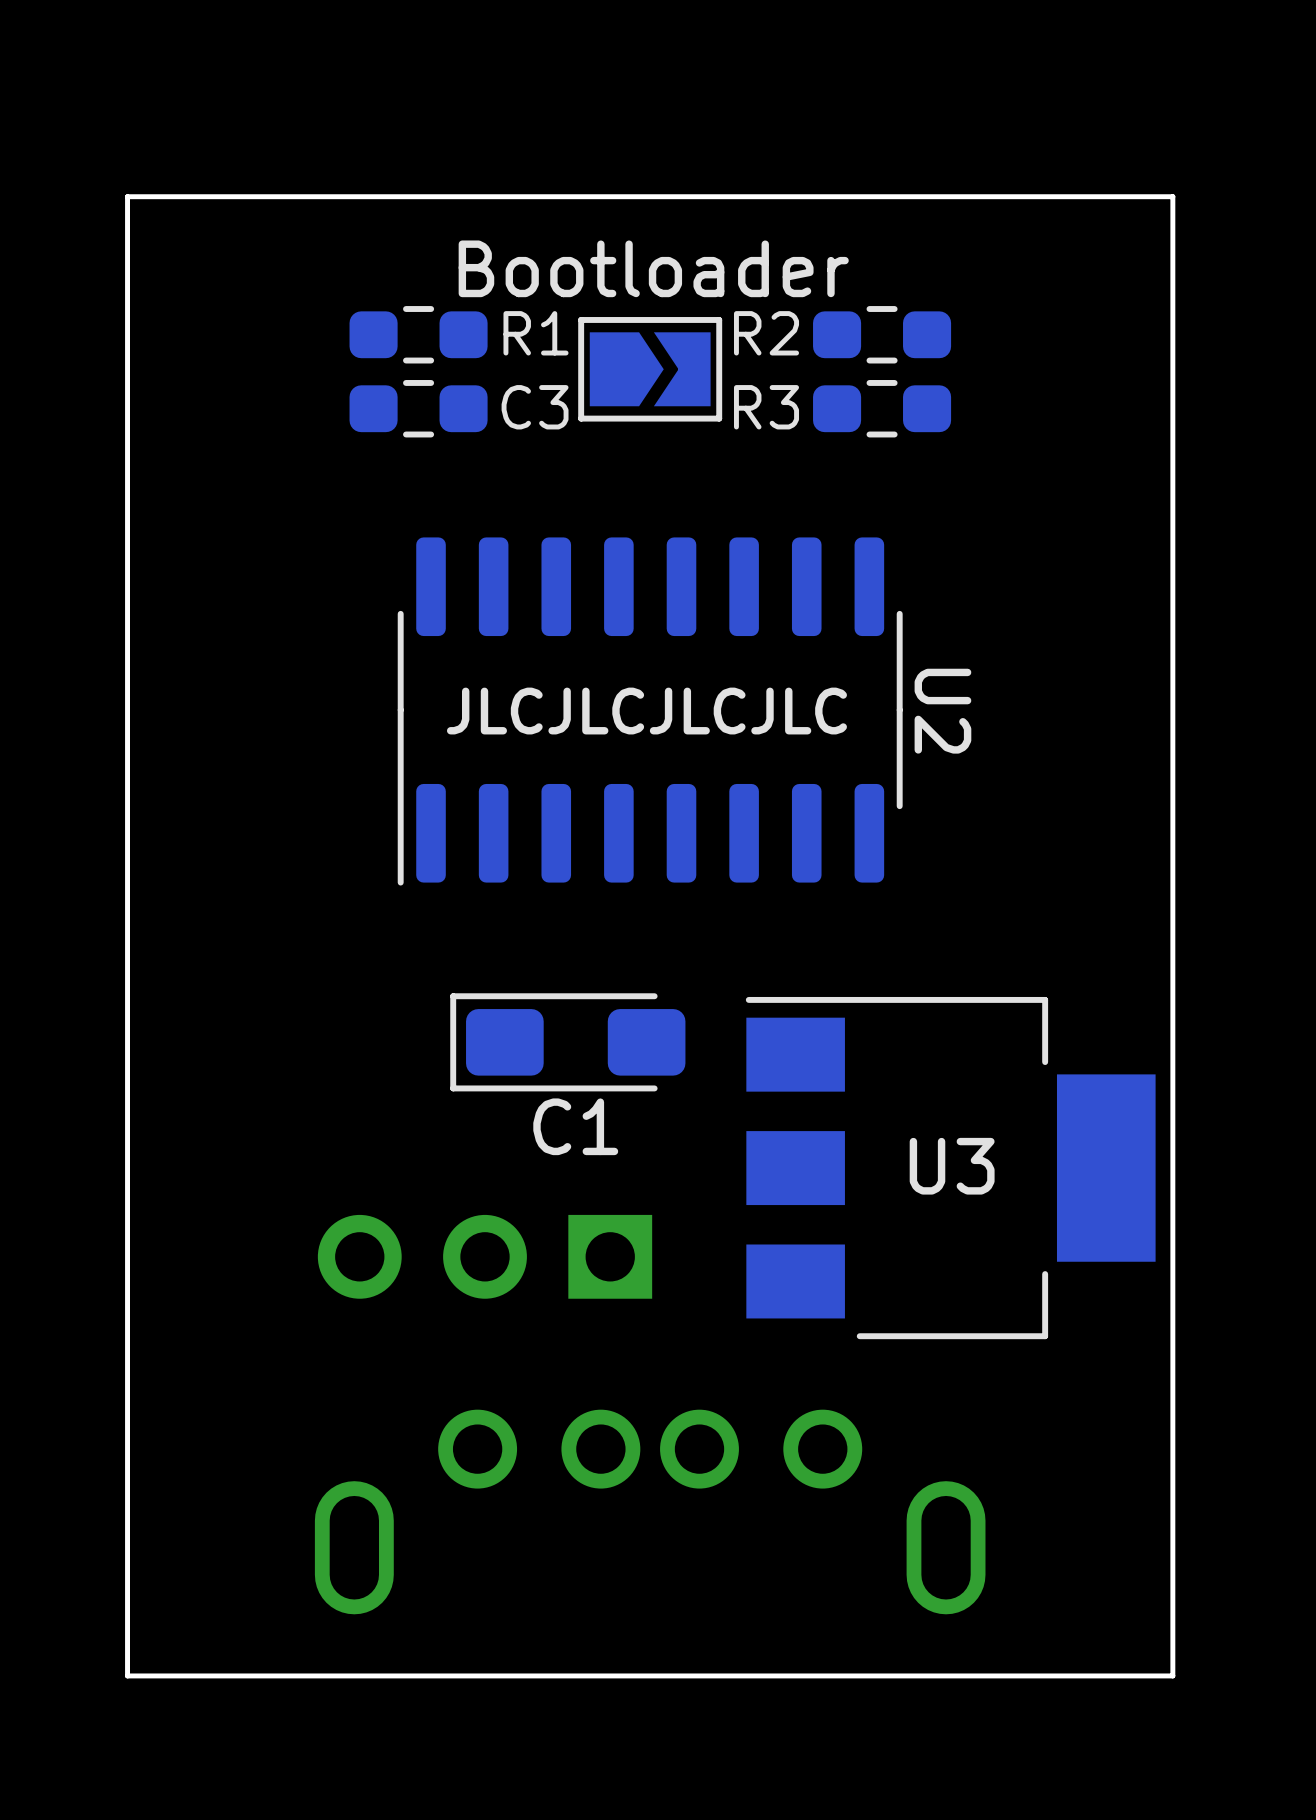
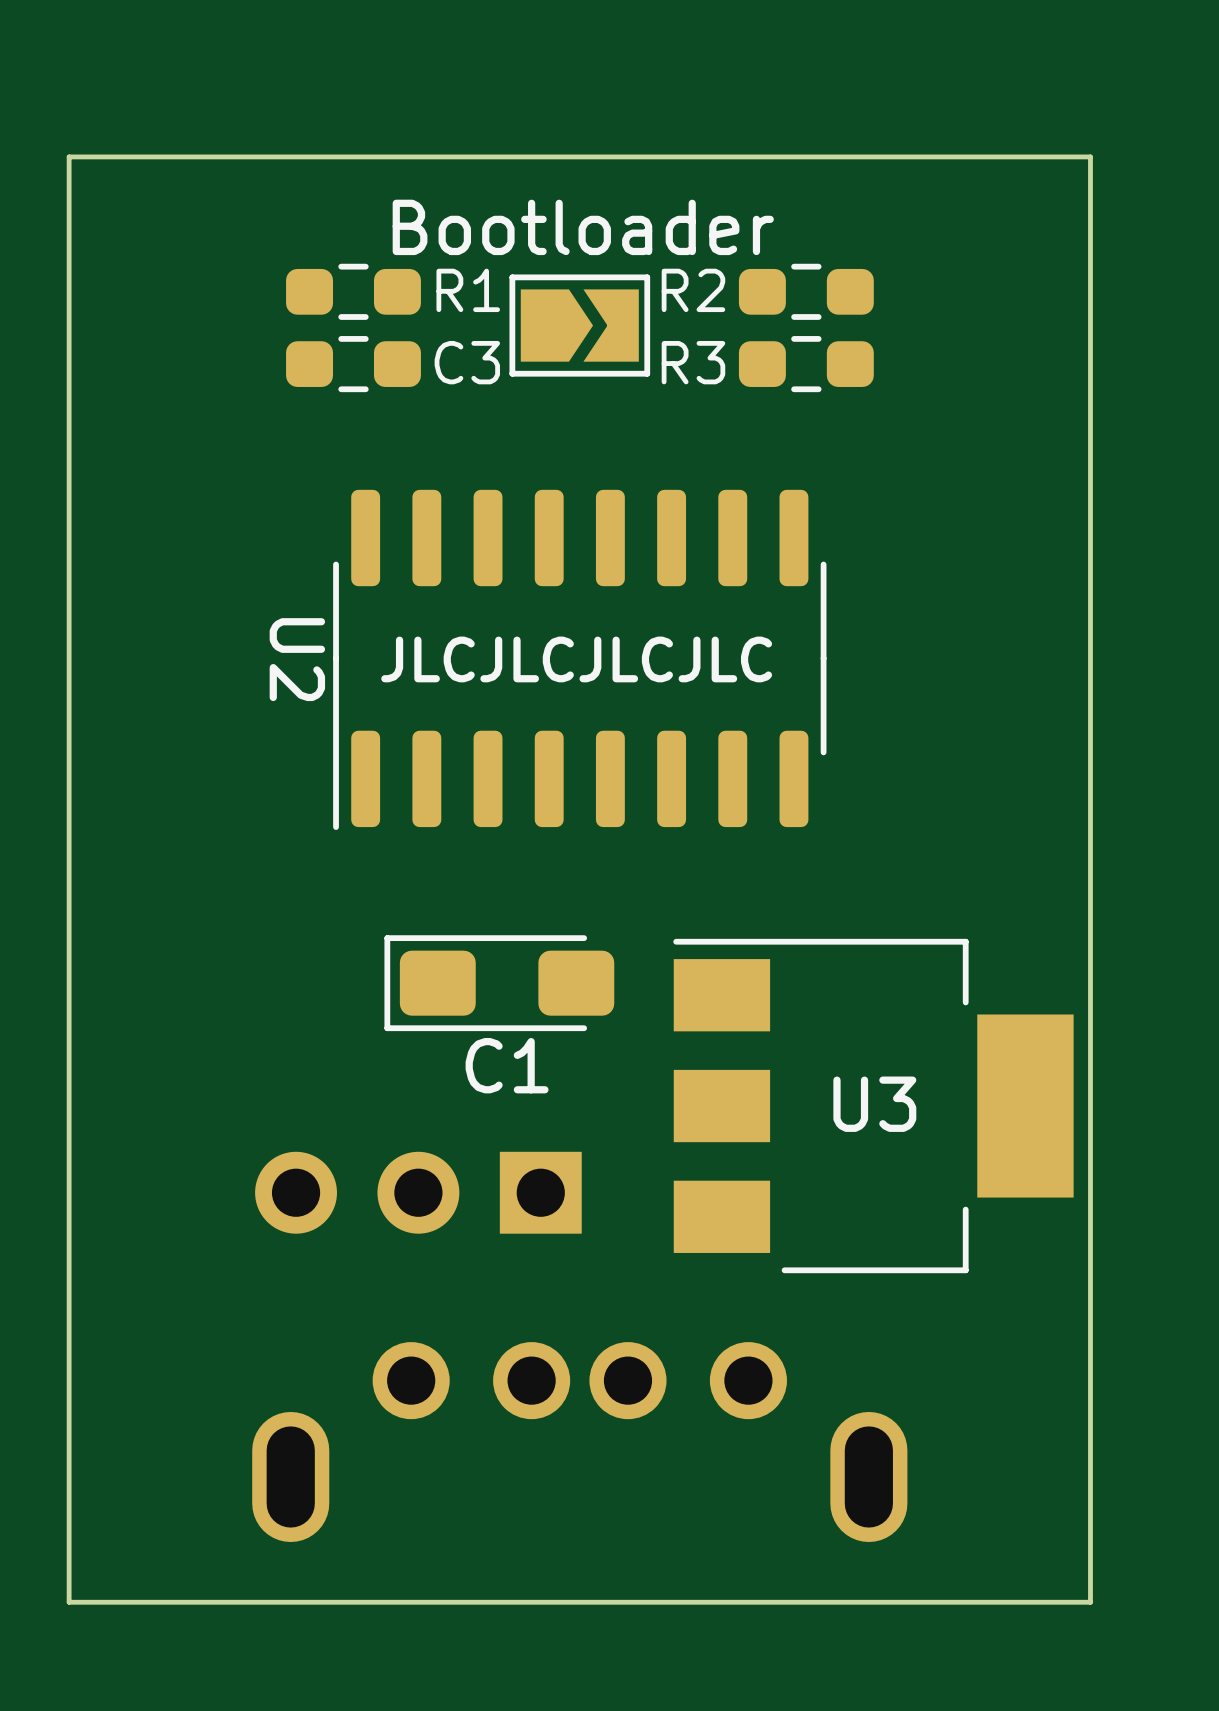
U2 name position: U2 (942, 711) -> U2 (297, 659)

